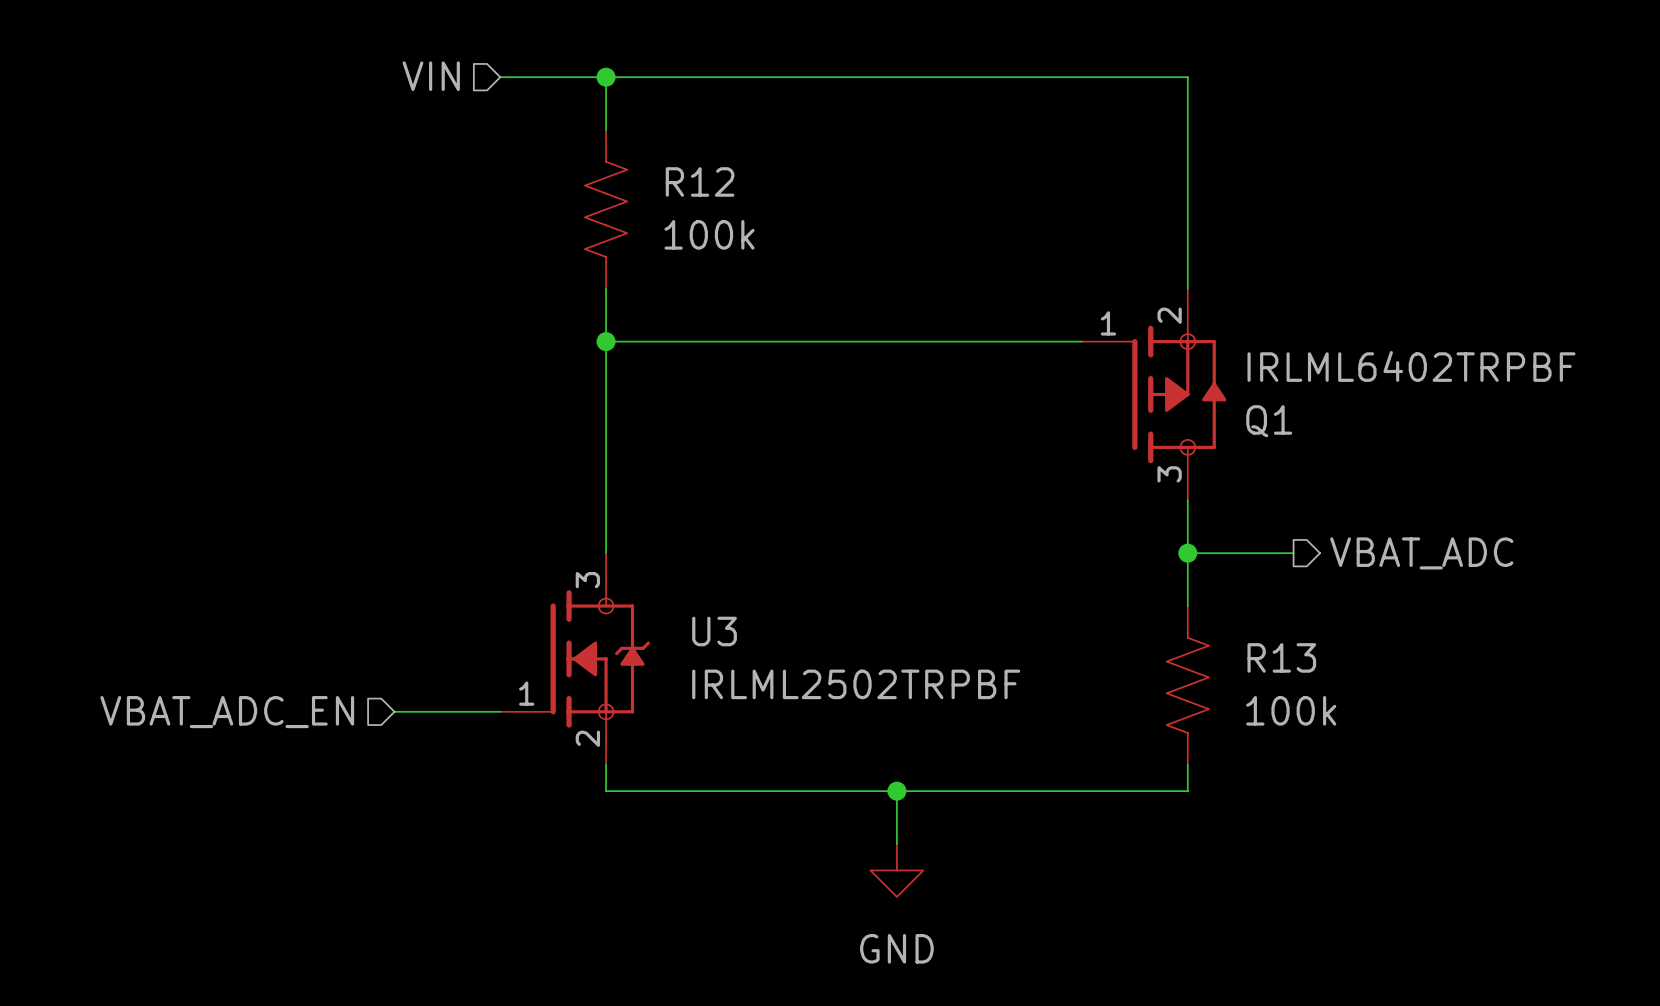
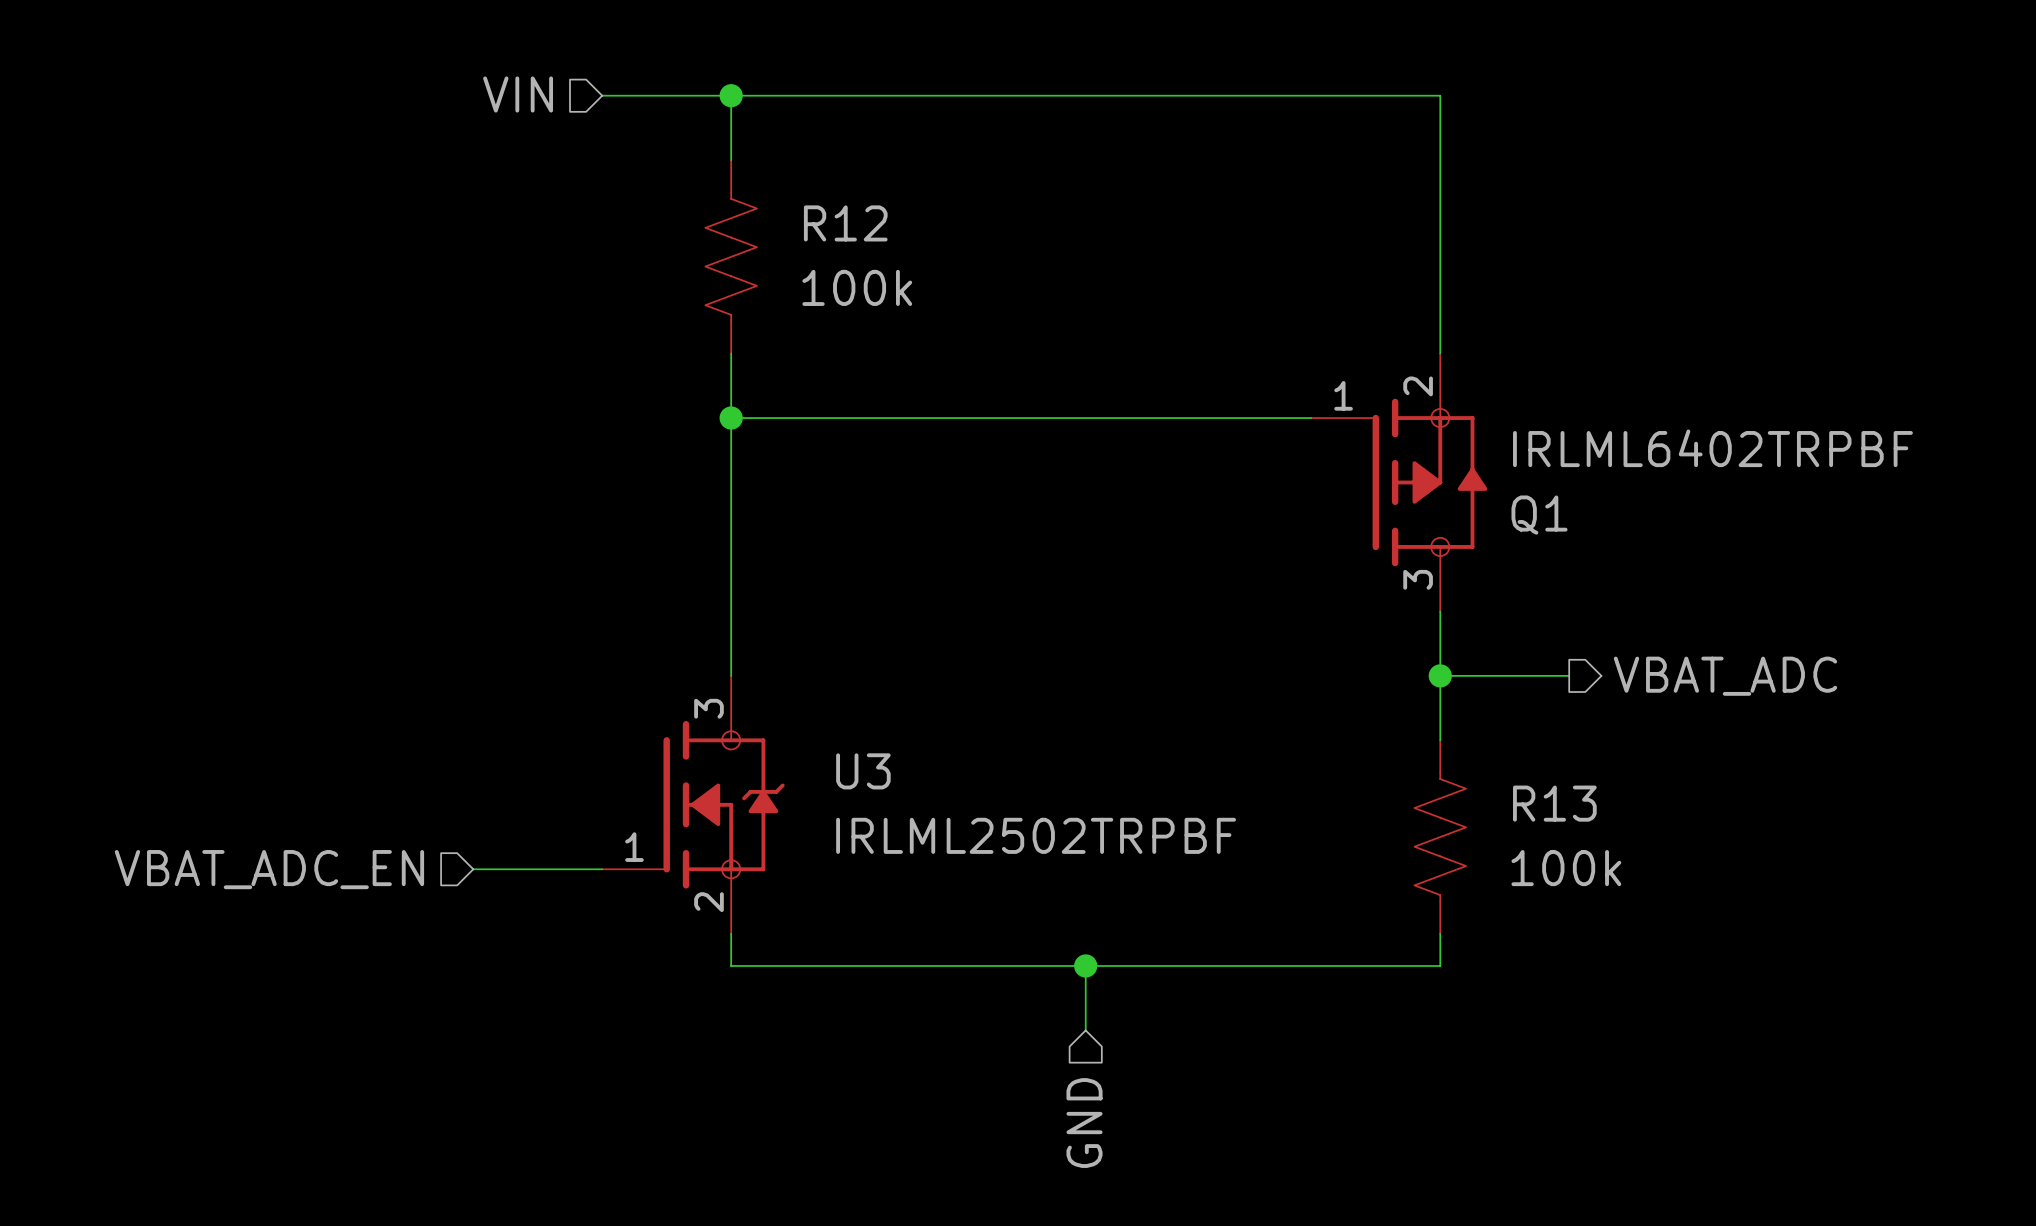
power symbol: GND (896, 870) -> none
hierarchical label: none -> GND (1084, 1123)

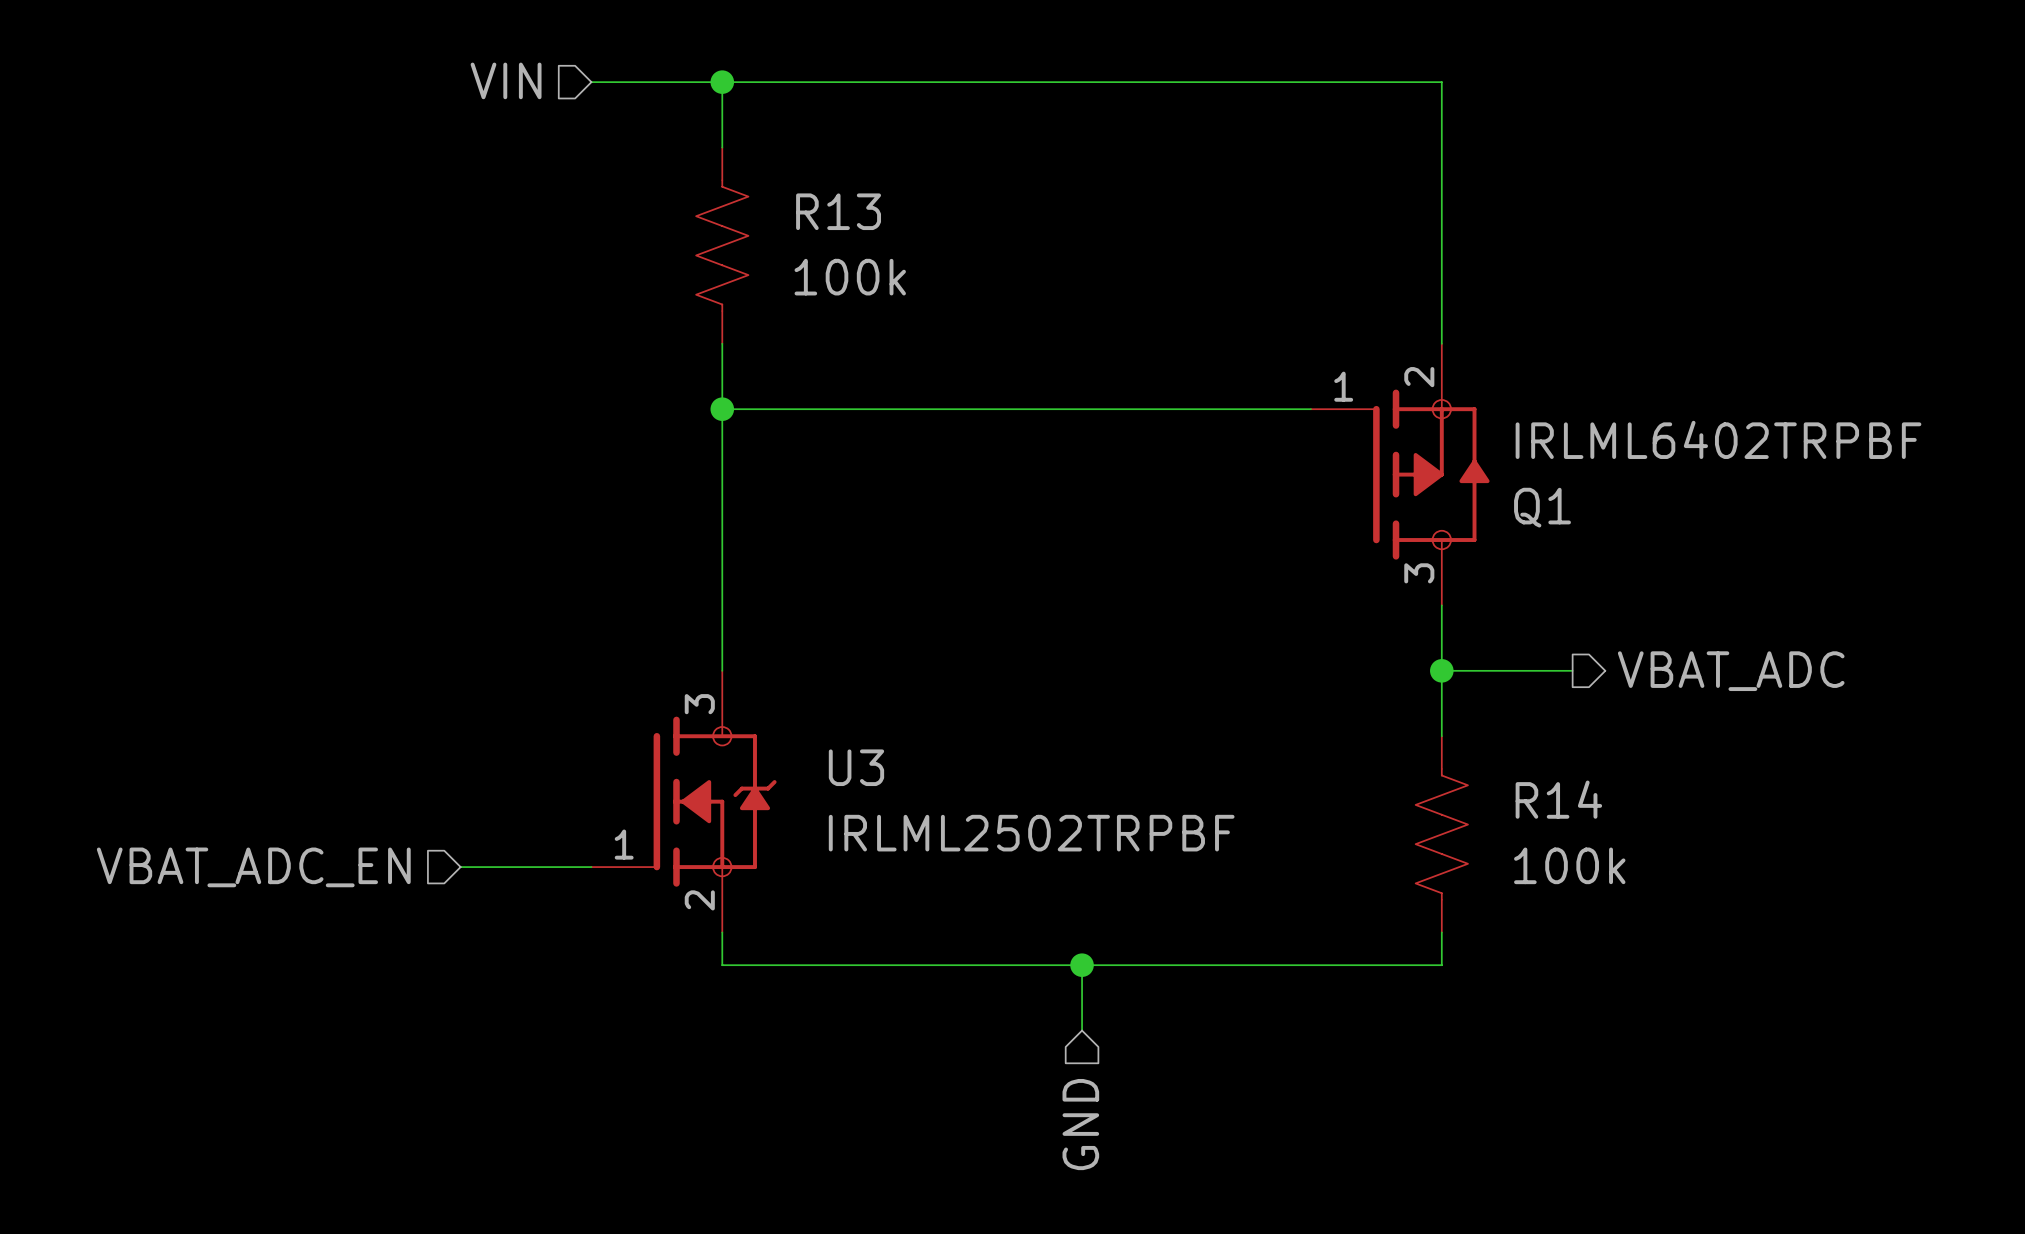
R12 name: R12 (845, 223) -> R13 (838, 211)
R13 name: R13 (1554, 803) -> R14 (1558, 799)

